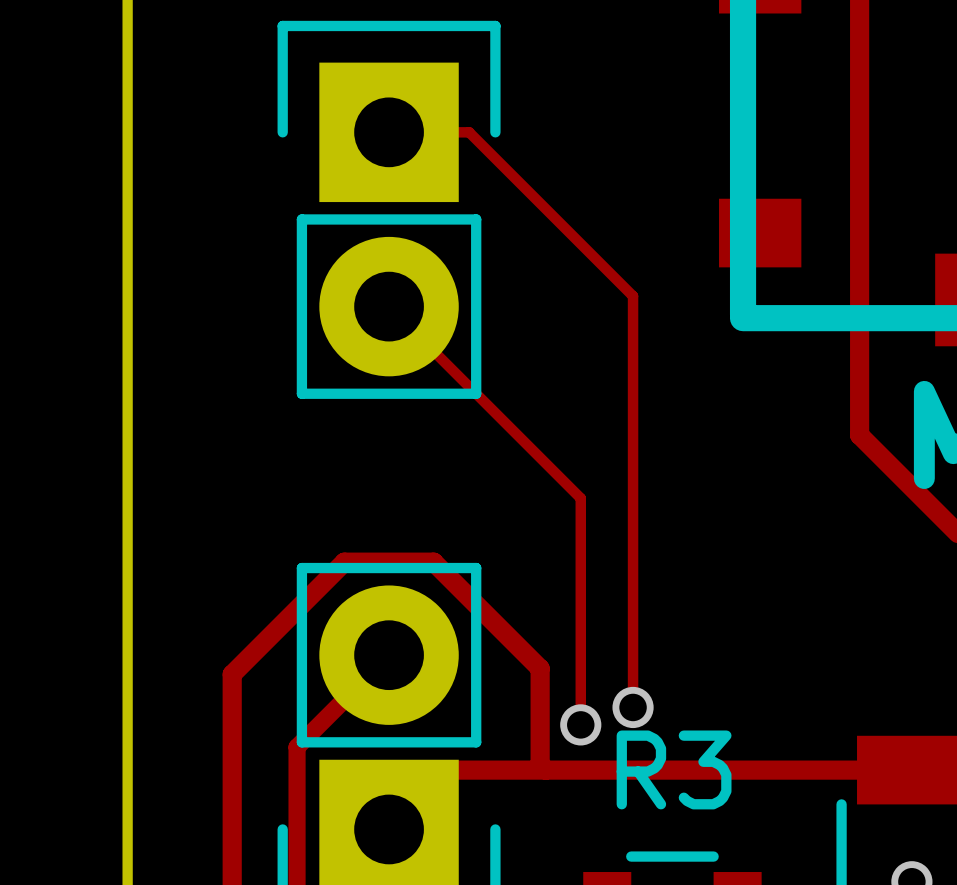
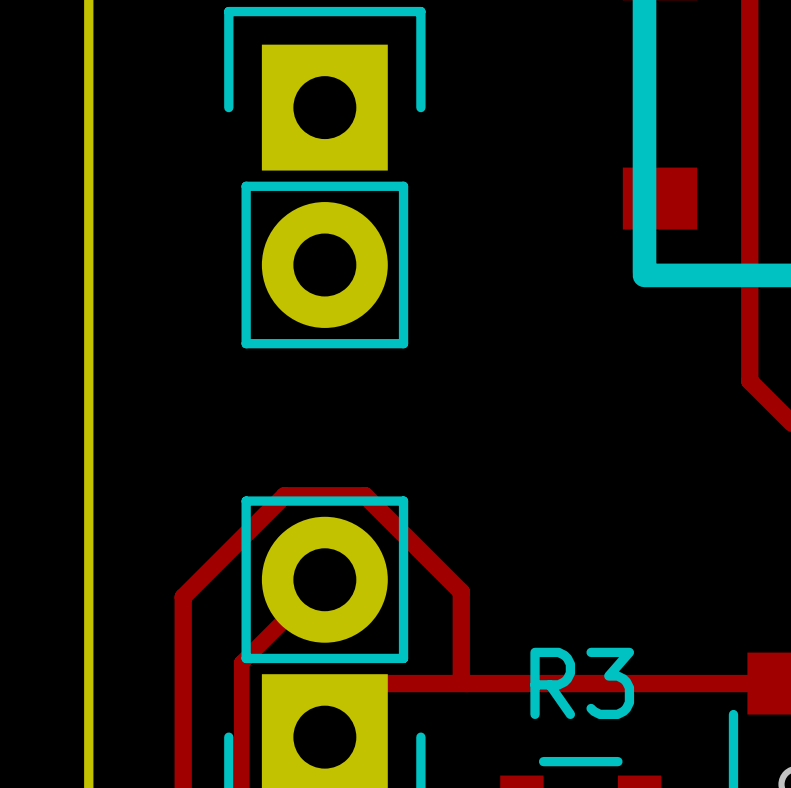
track: (389, 132) (469, 132) (633, 296) (633, 707) -> none
track: (389, 306) (580, 498) (580, 724) -> none
via: (633, 707) -> none
via: (580, 724) -> none

